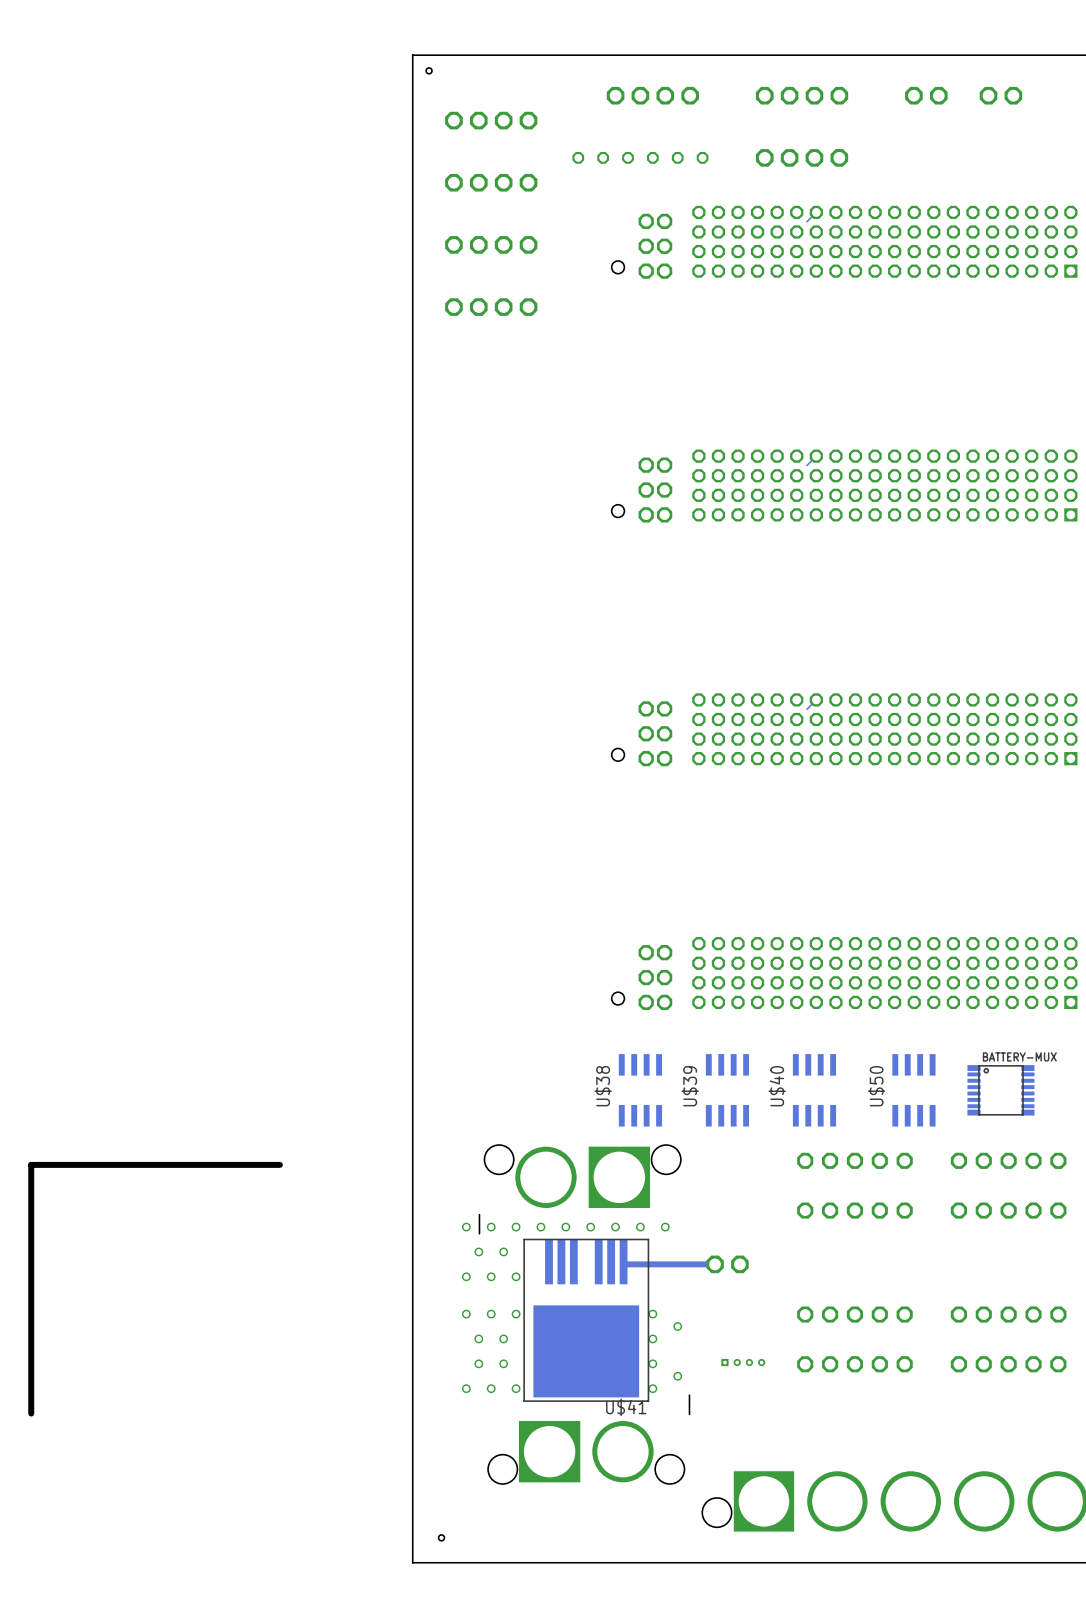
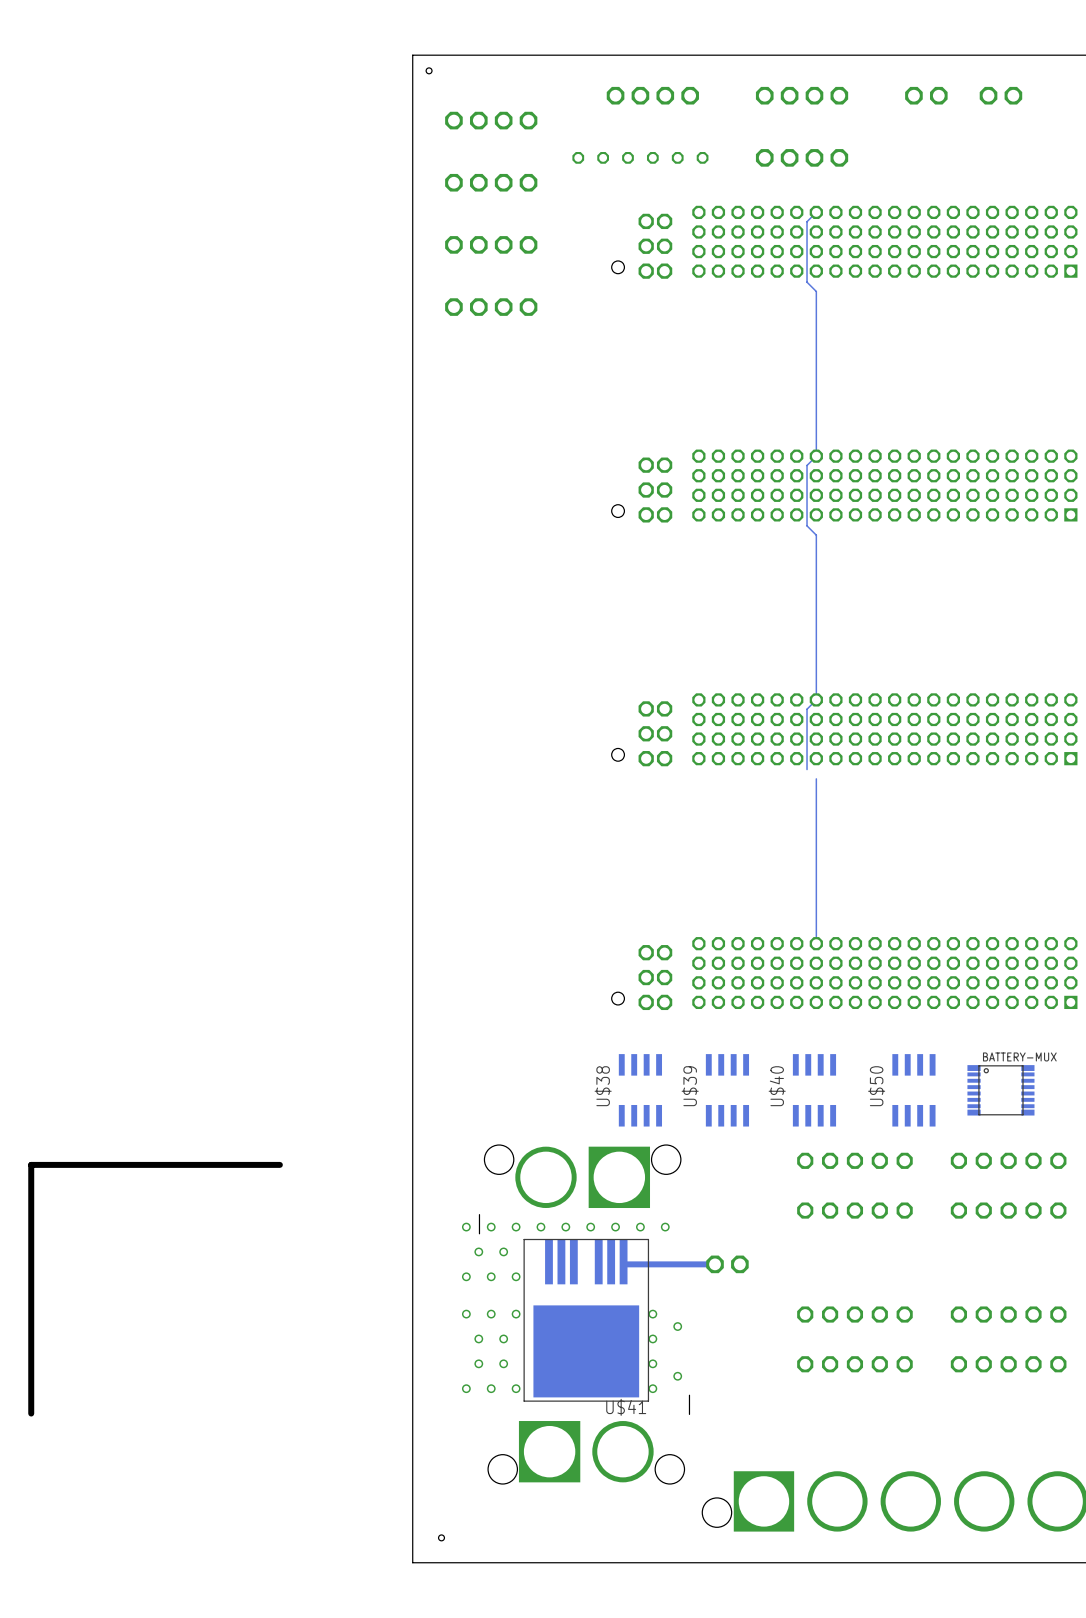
track: none -> (807, 221) (807, 282) (816, 291) (816, 456)
track: none -> (807, 465) (807, 525) (816, 535) (816, 699)
track: none -> (807, 709) (807, 769)
track: none -> (816, 778) (816, 943)
part: (743, 1362) -> none

